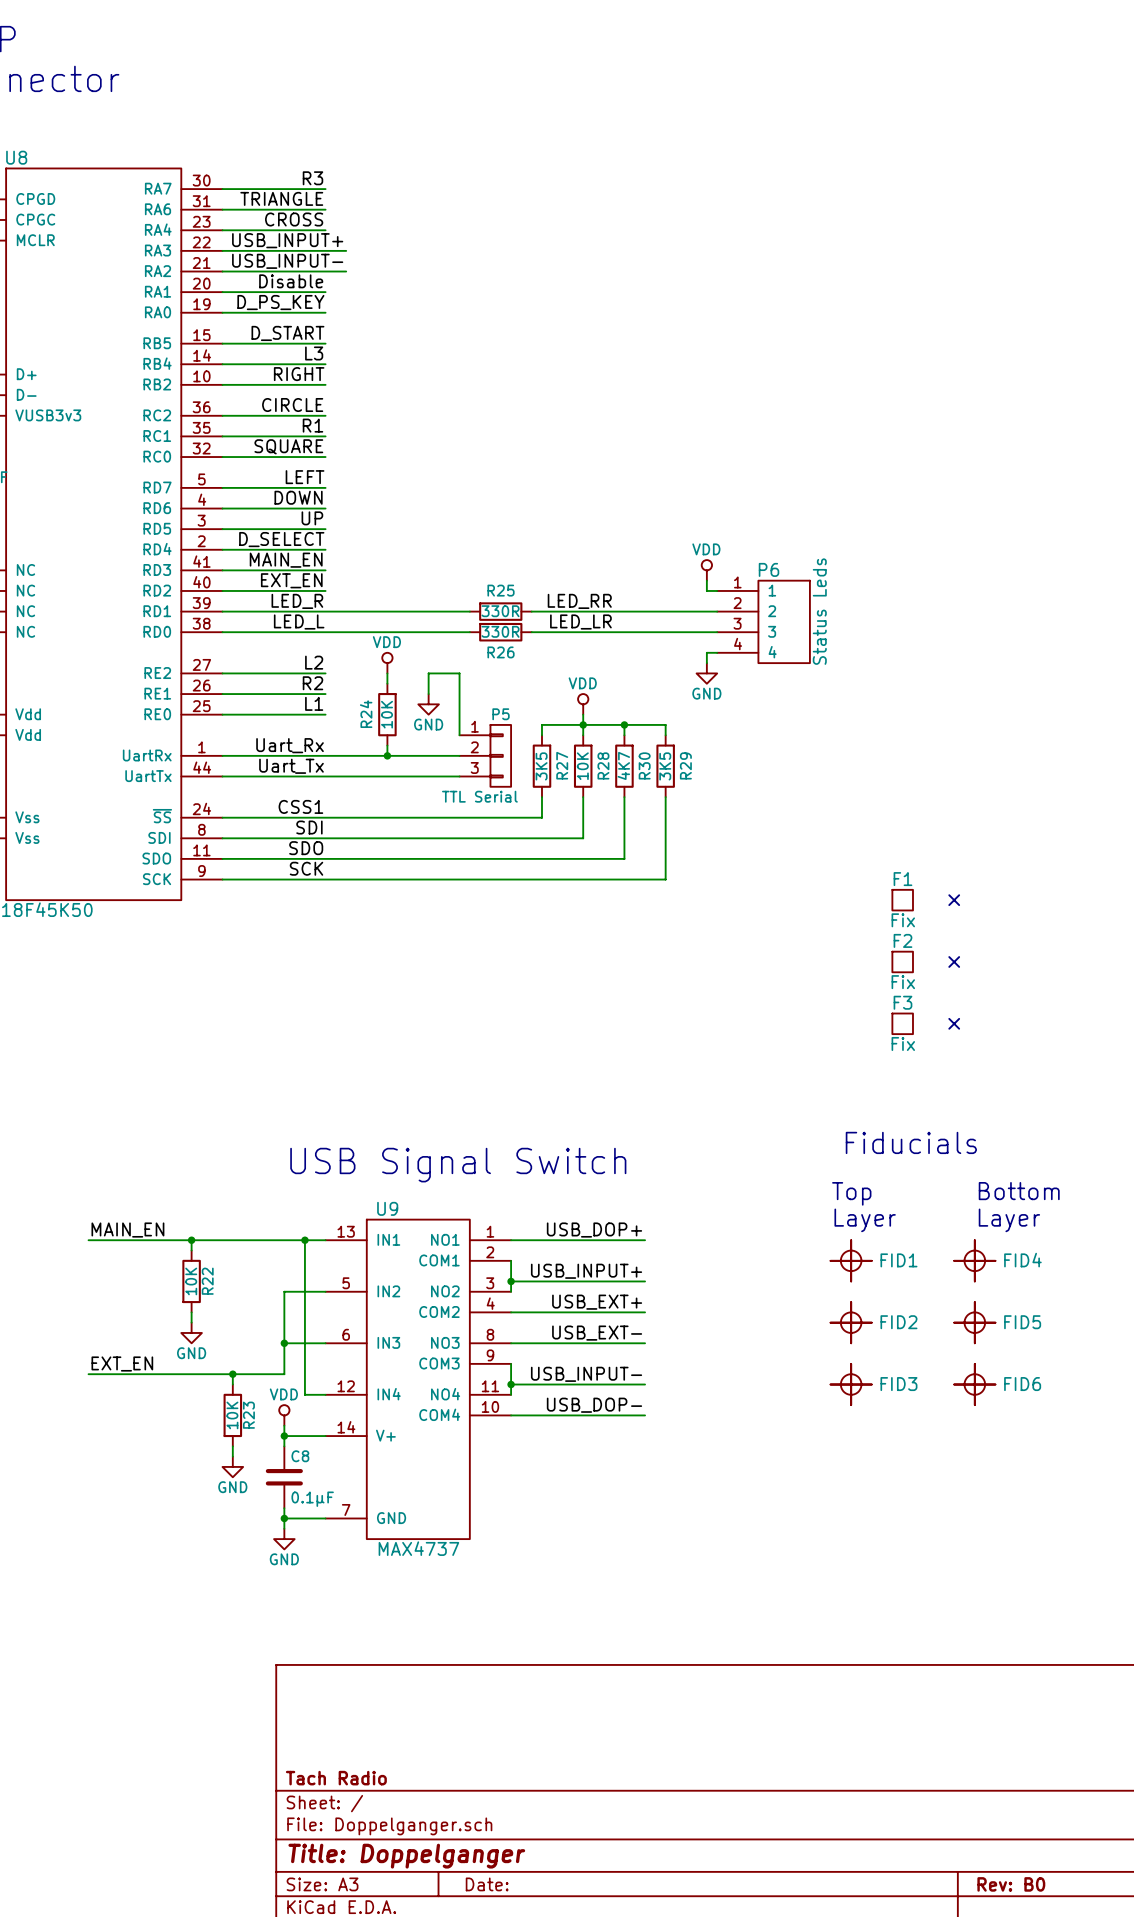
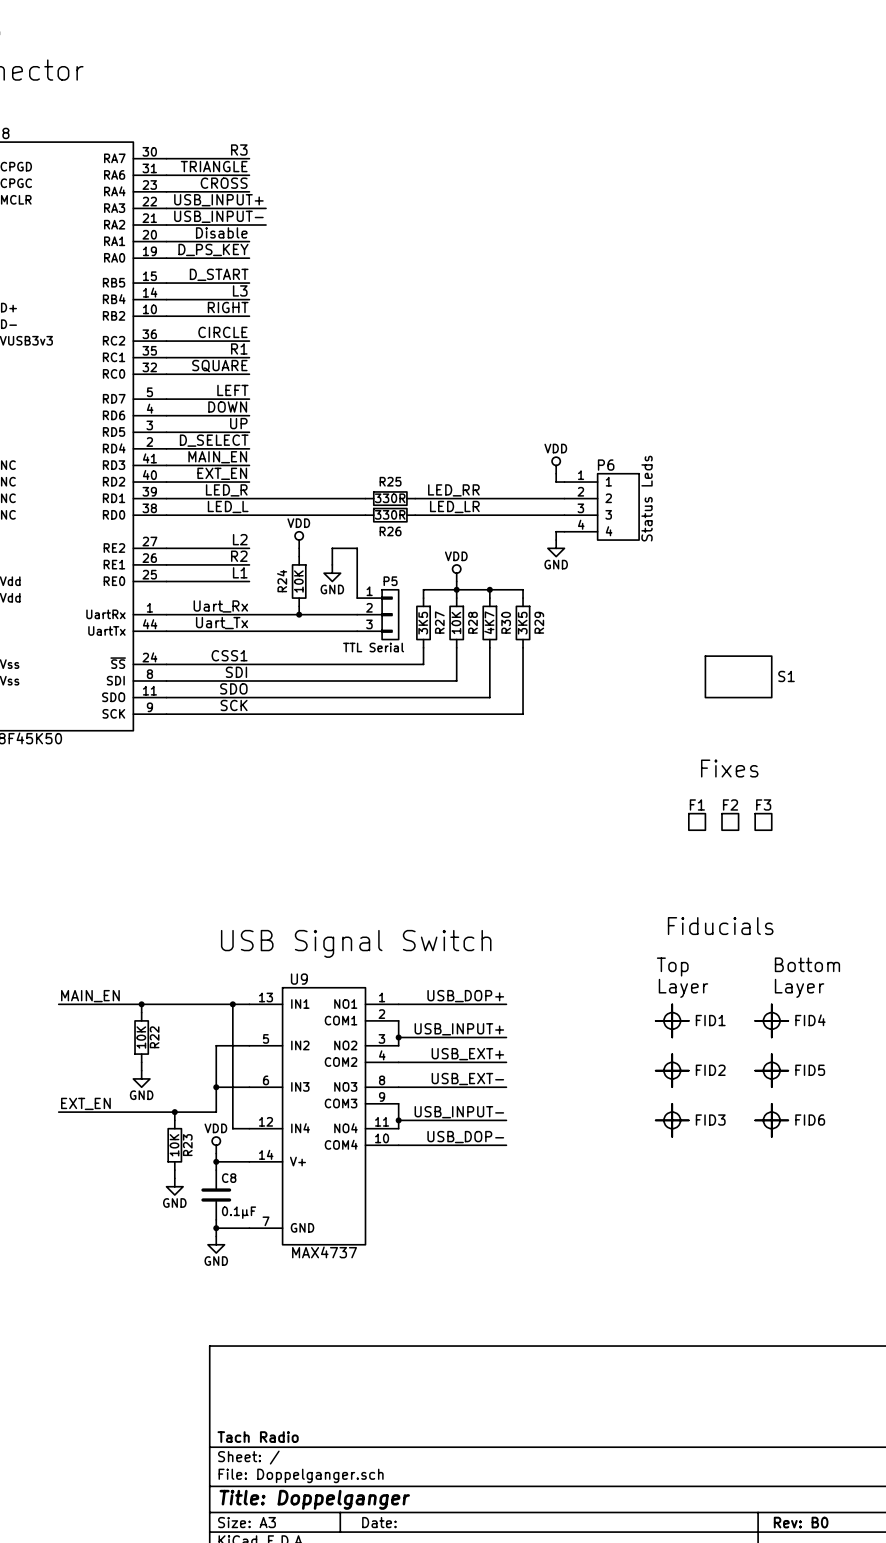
S1: none -> (738, 676)
F1 position: (902, 900) -> (697, 821)
no-connect mark: (954, 900) -> none
F1 value: Fix (903, 920) -> none
text: none -> Fixes (729, 768)
F2 position: (902, 961) -> (730, 821)
no-connect mark: (954, 961) -> none
F2 value: Fix (903, 982) -> none
F3 position: (902, 1023) -> (763, 821)
no-connect mark: (954, 1023) -> none
F3 value: Fix (903, 1043) -> none

